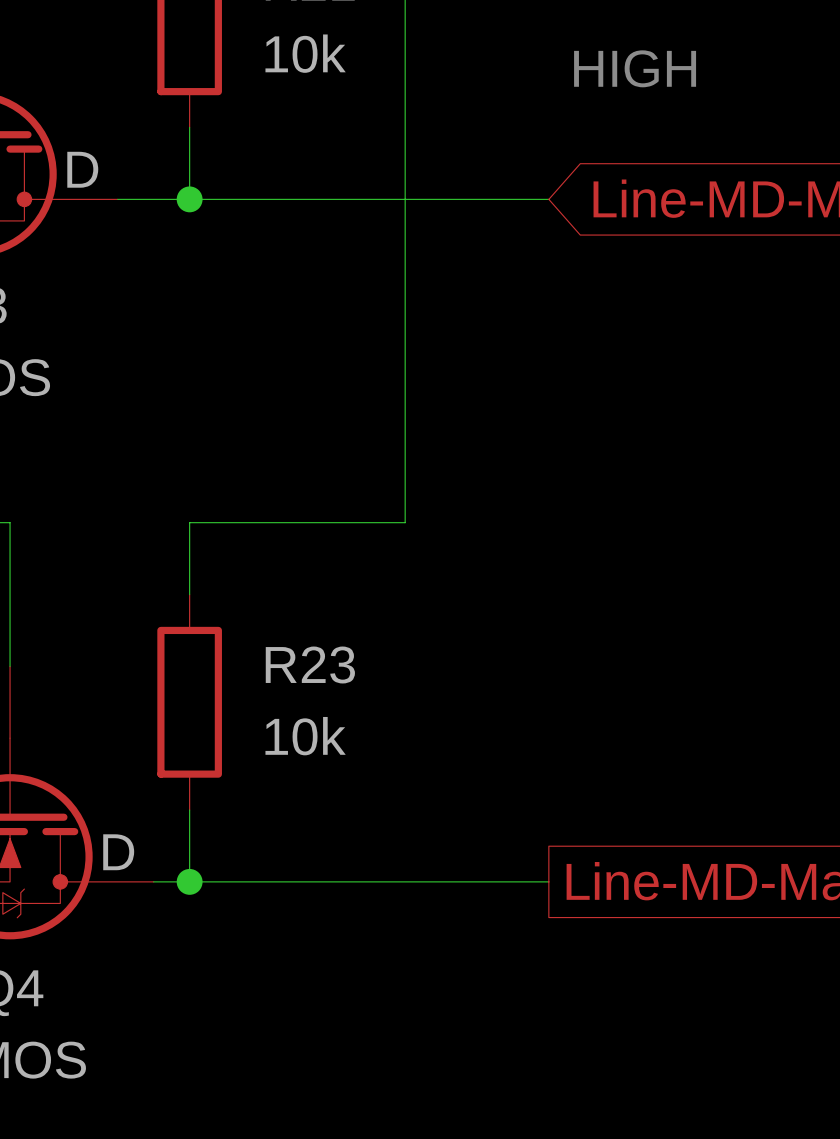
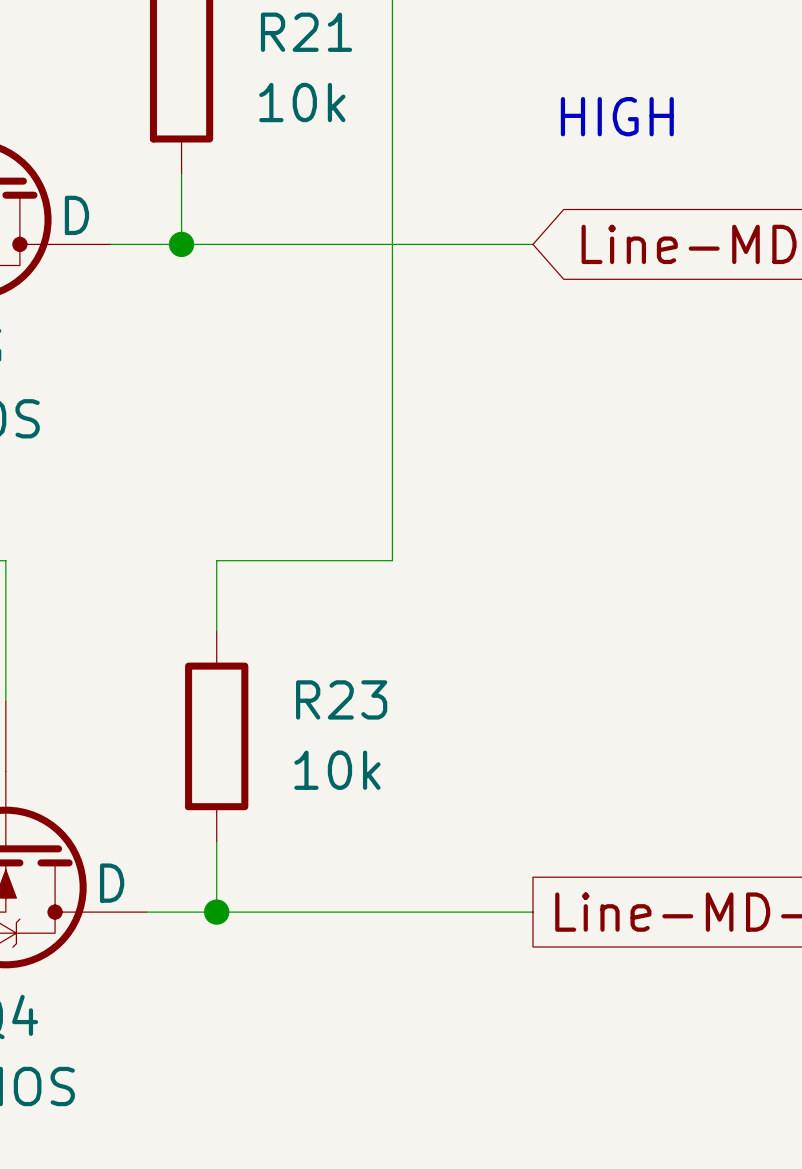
wire: (225, 522) (189, 522) (189, 594) -> (216, 560) (216, 630)
R23 position: (189, 702) -> (216, 736)
wire: (189, 810) (189, 881) -> (216, 841) (216, 912)
junction position: (189, 881) -> (216, 912)

